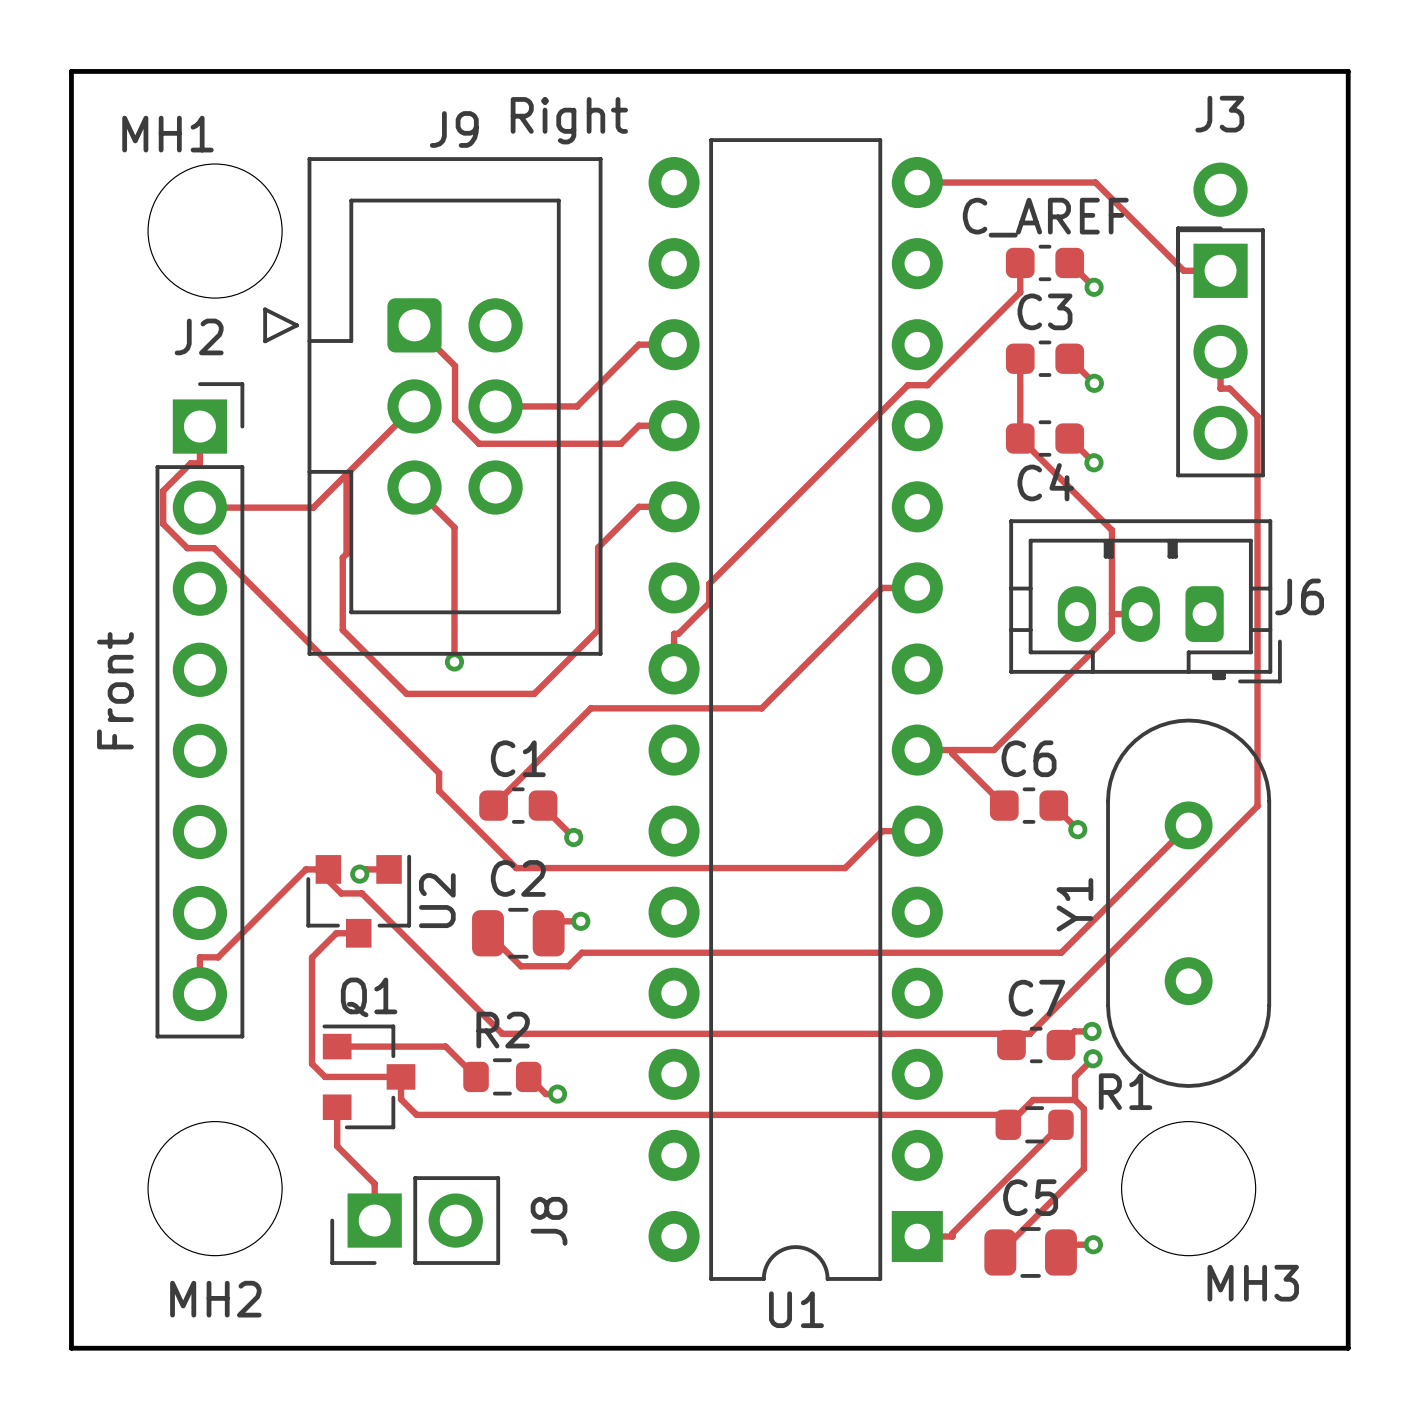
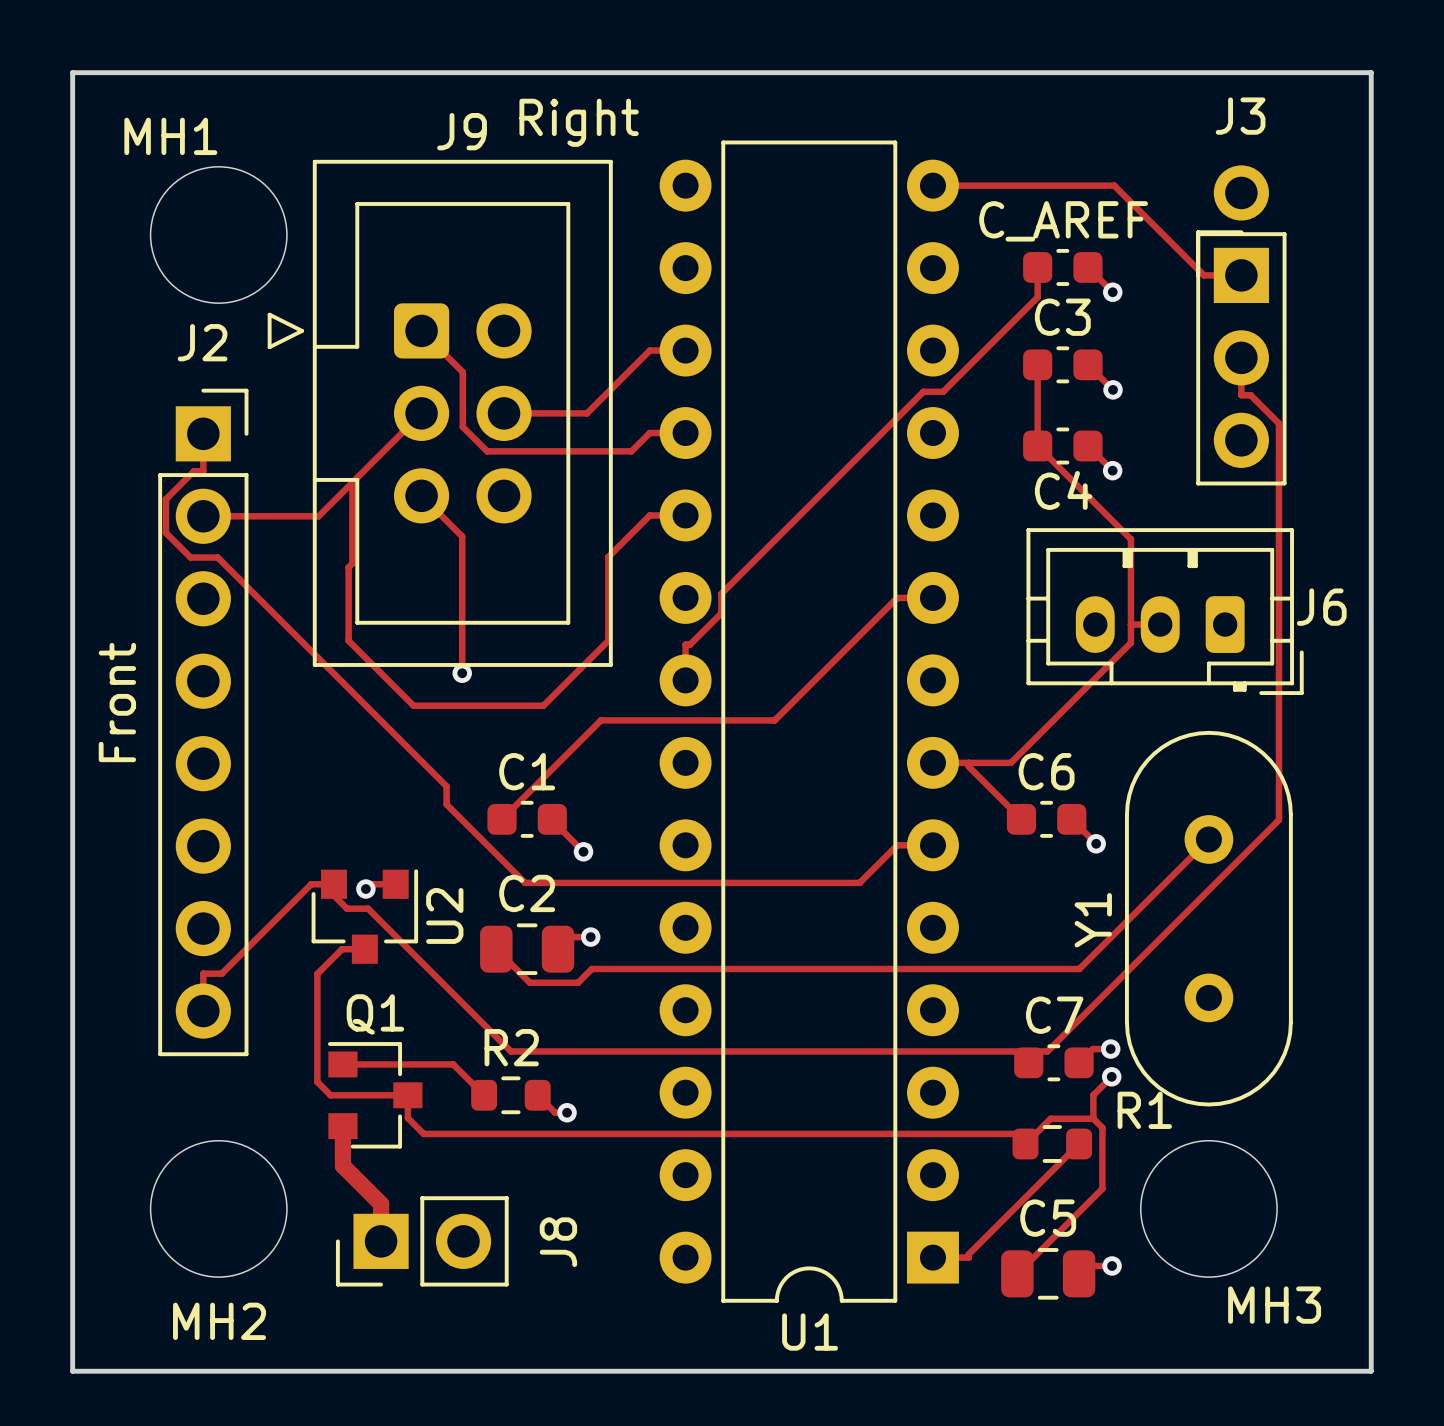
track width: thin (337, 1107) (337, 1146) (374, 1183) (374, 1220) -> thick (342, 1126) (342, 1165) (381, 1203) (381, 1241)

